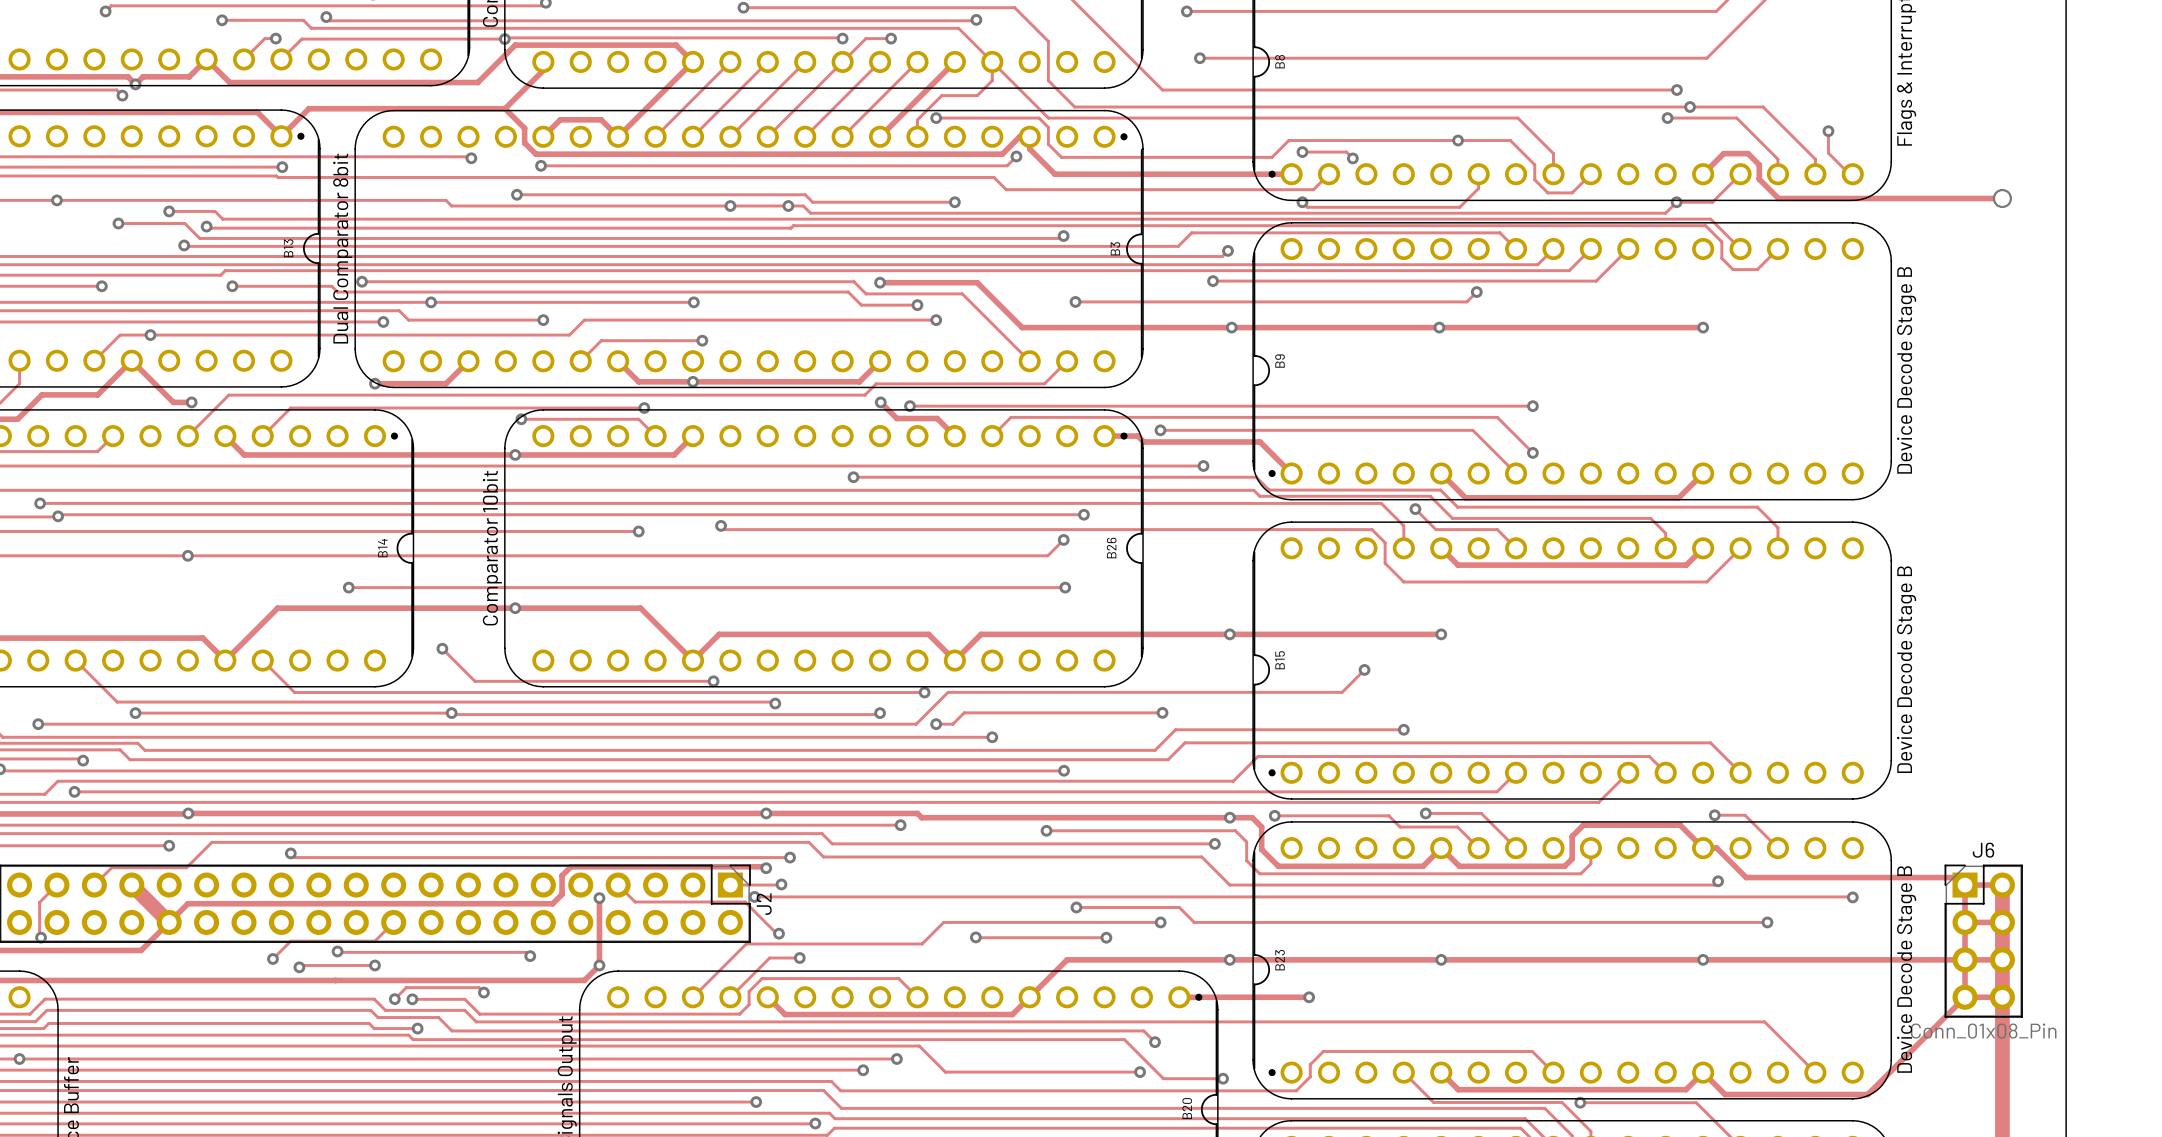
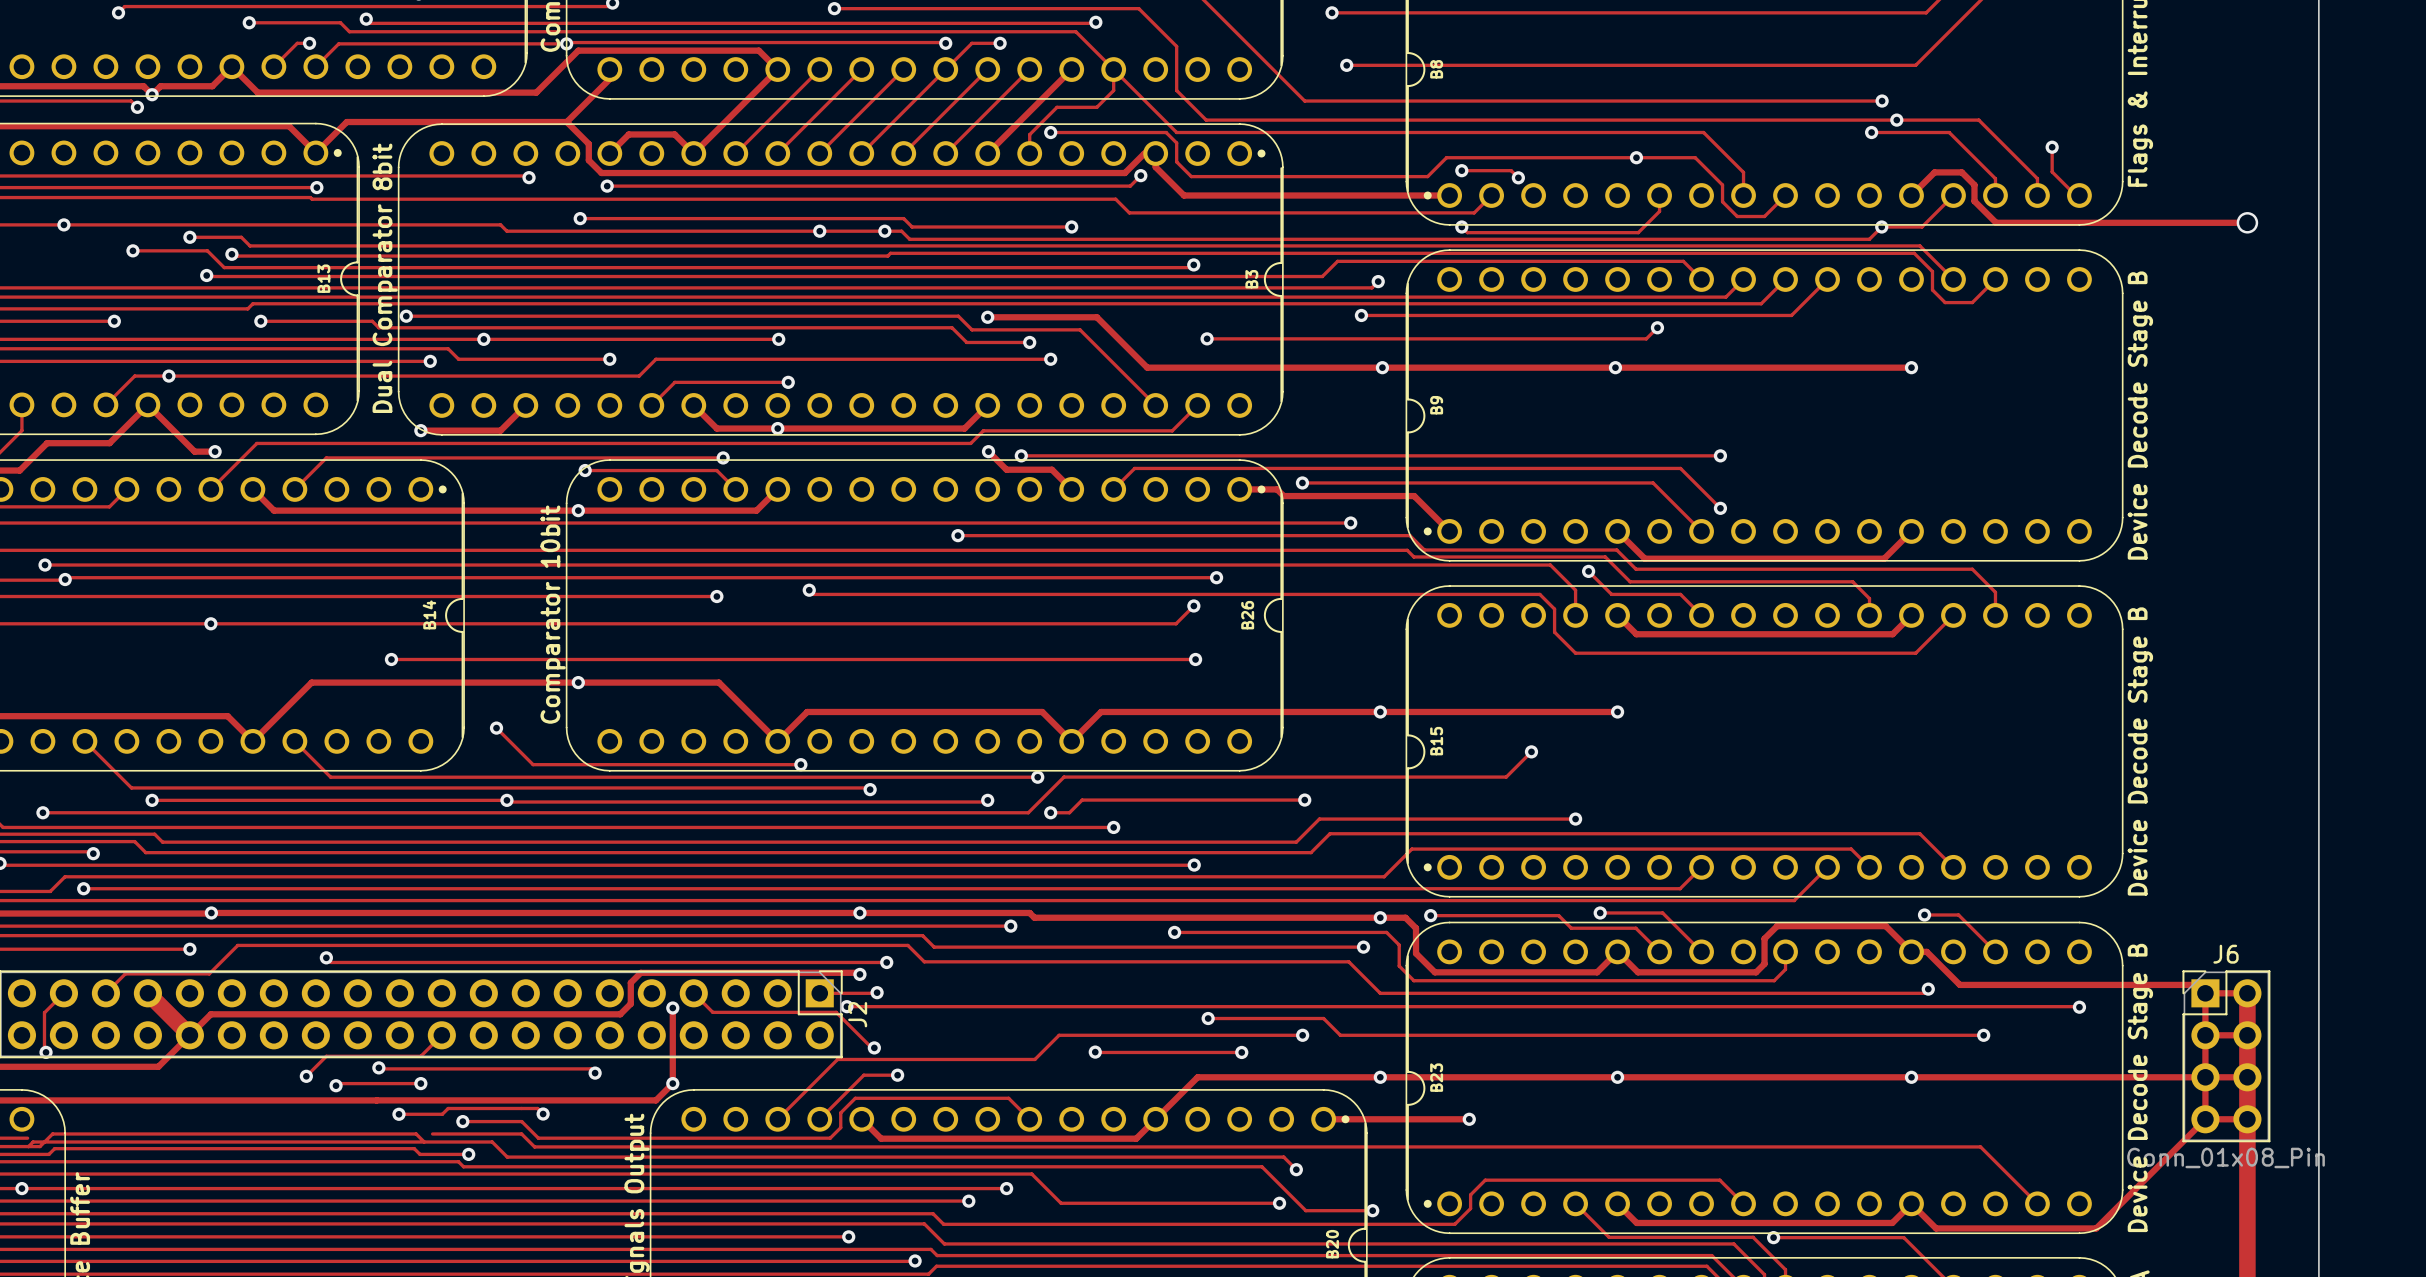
track: (406, 987) (394, 999) -> (456, 1108) (448, 1108) (442, 1114) (398, 1114)
via position: (394, 999) -> (398, 1114)
track: (385, 1010) (374, 999) (44, 999) (30, 1014) (24, 1014) -> none
track: none -> (424, 1142) (33, 1142) (28, 1146)

